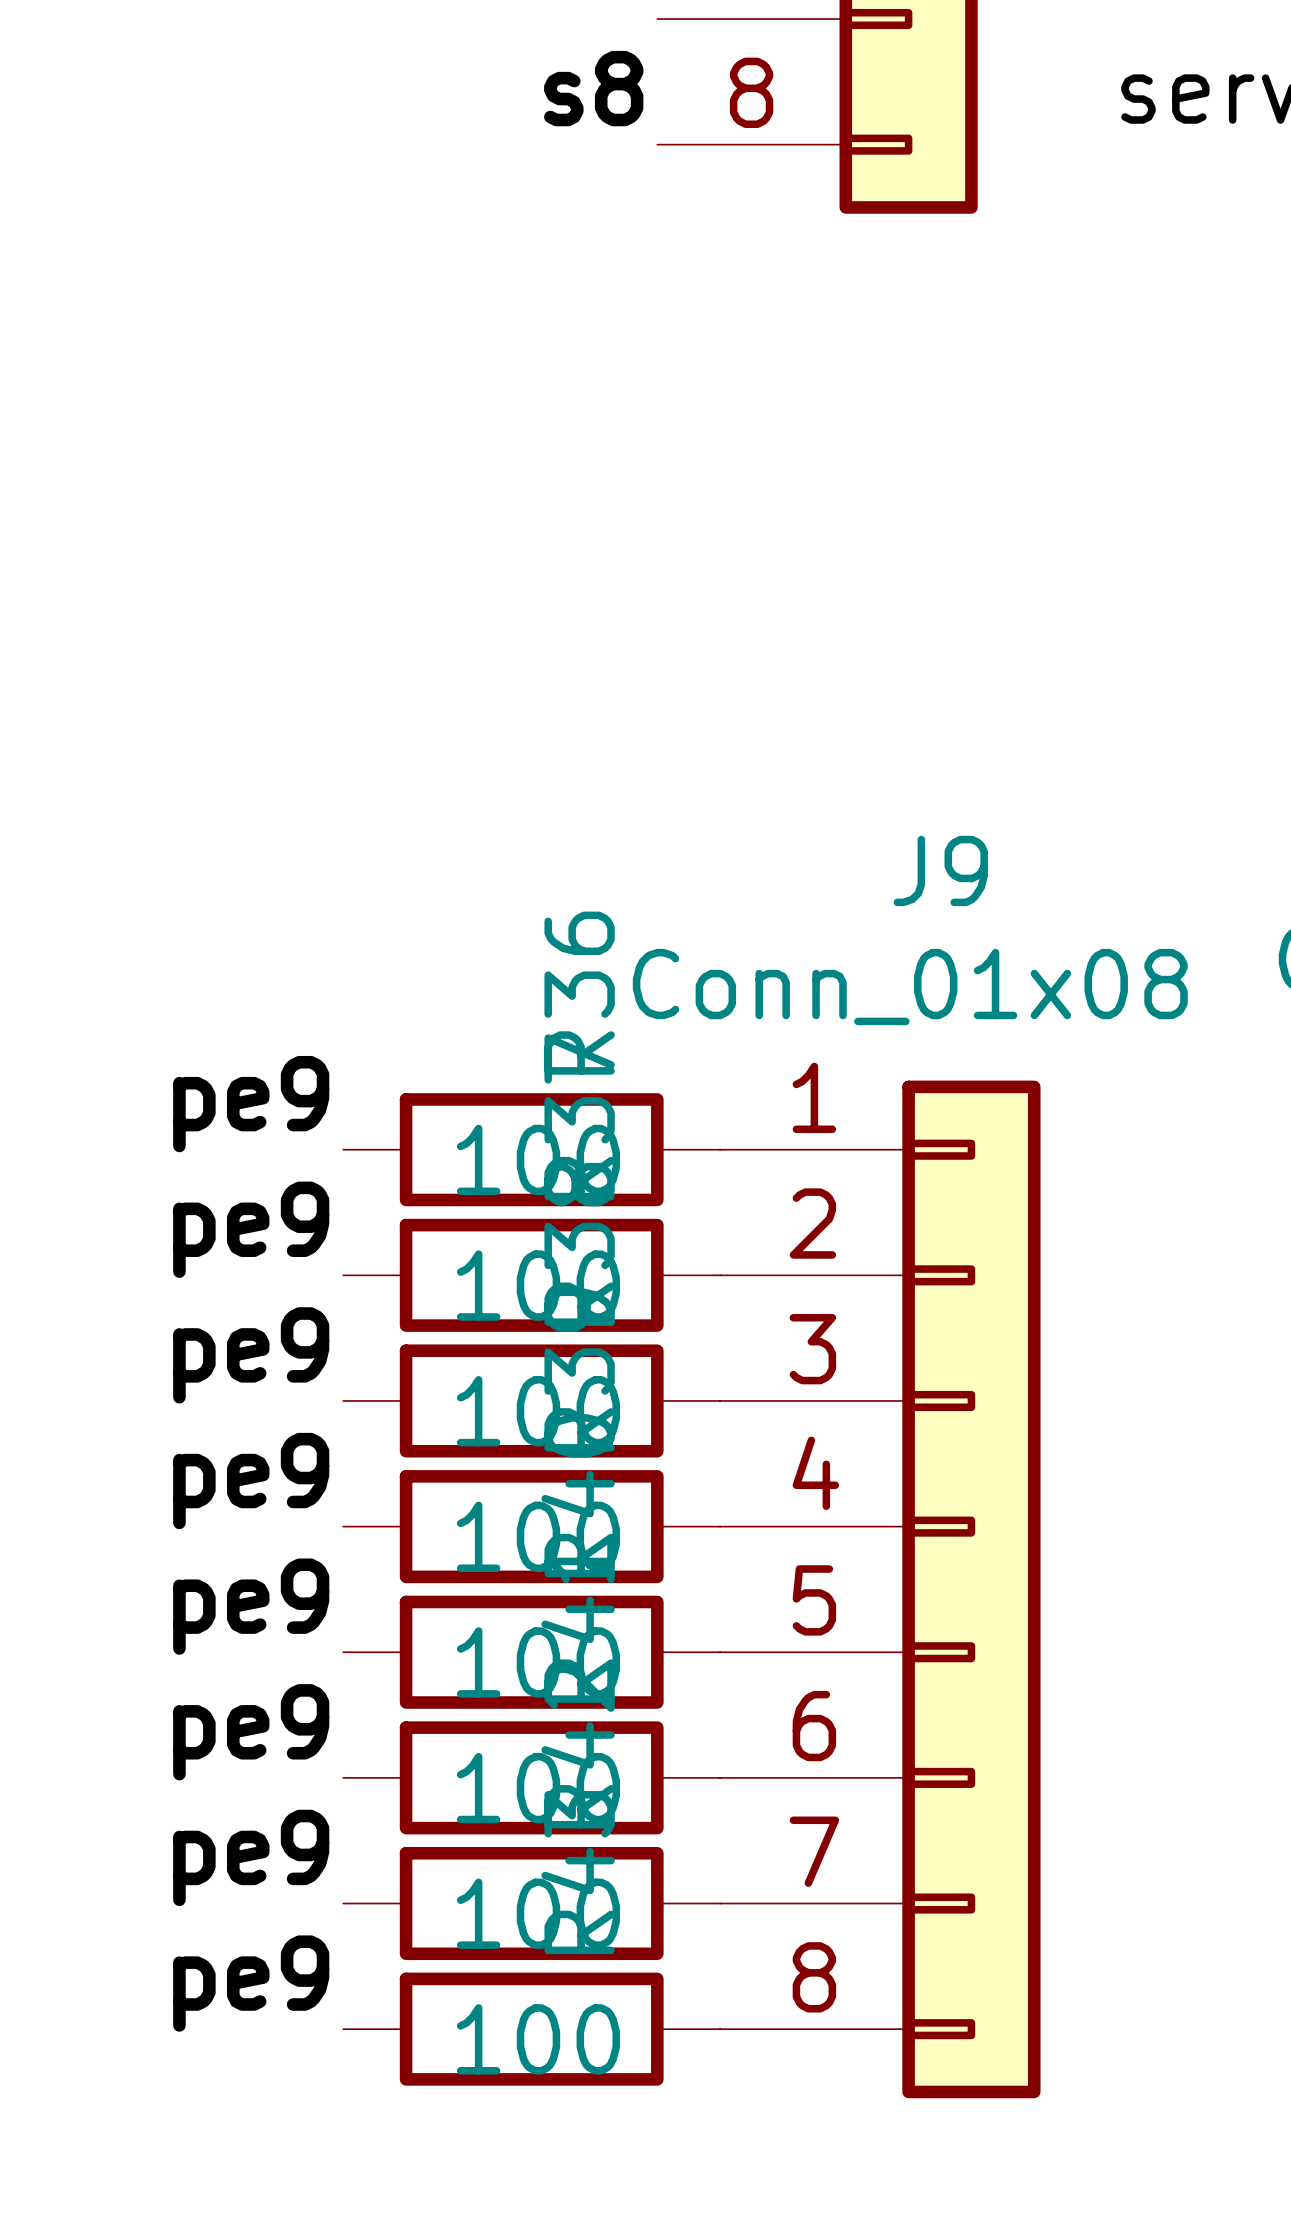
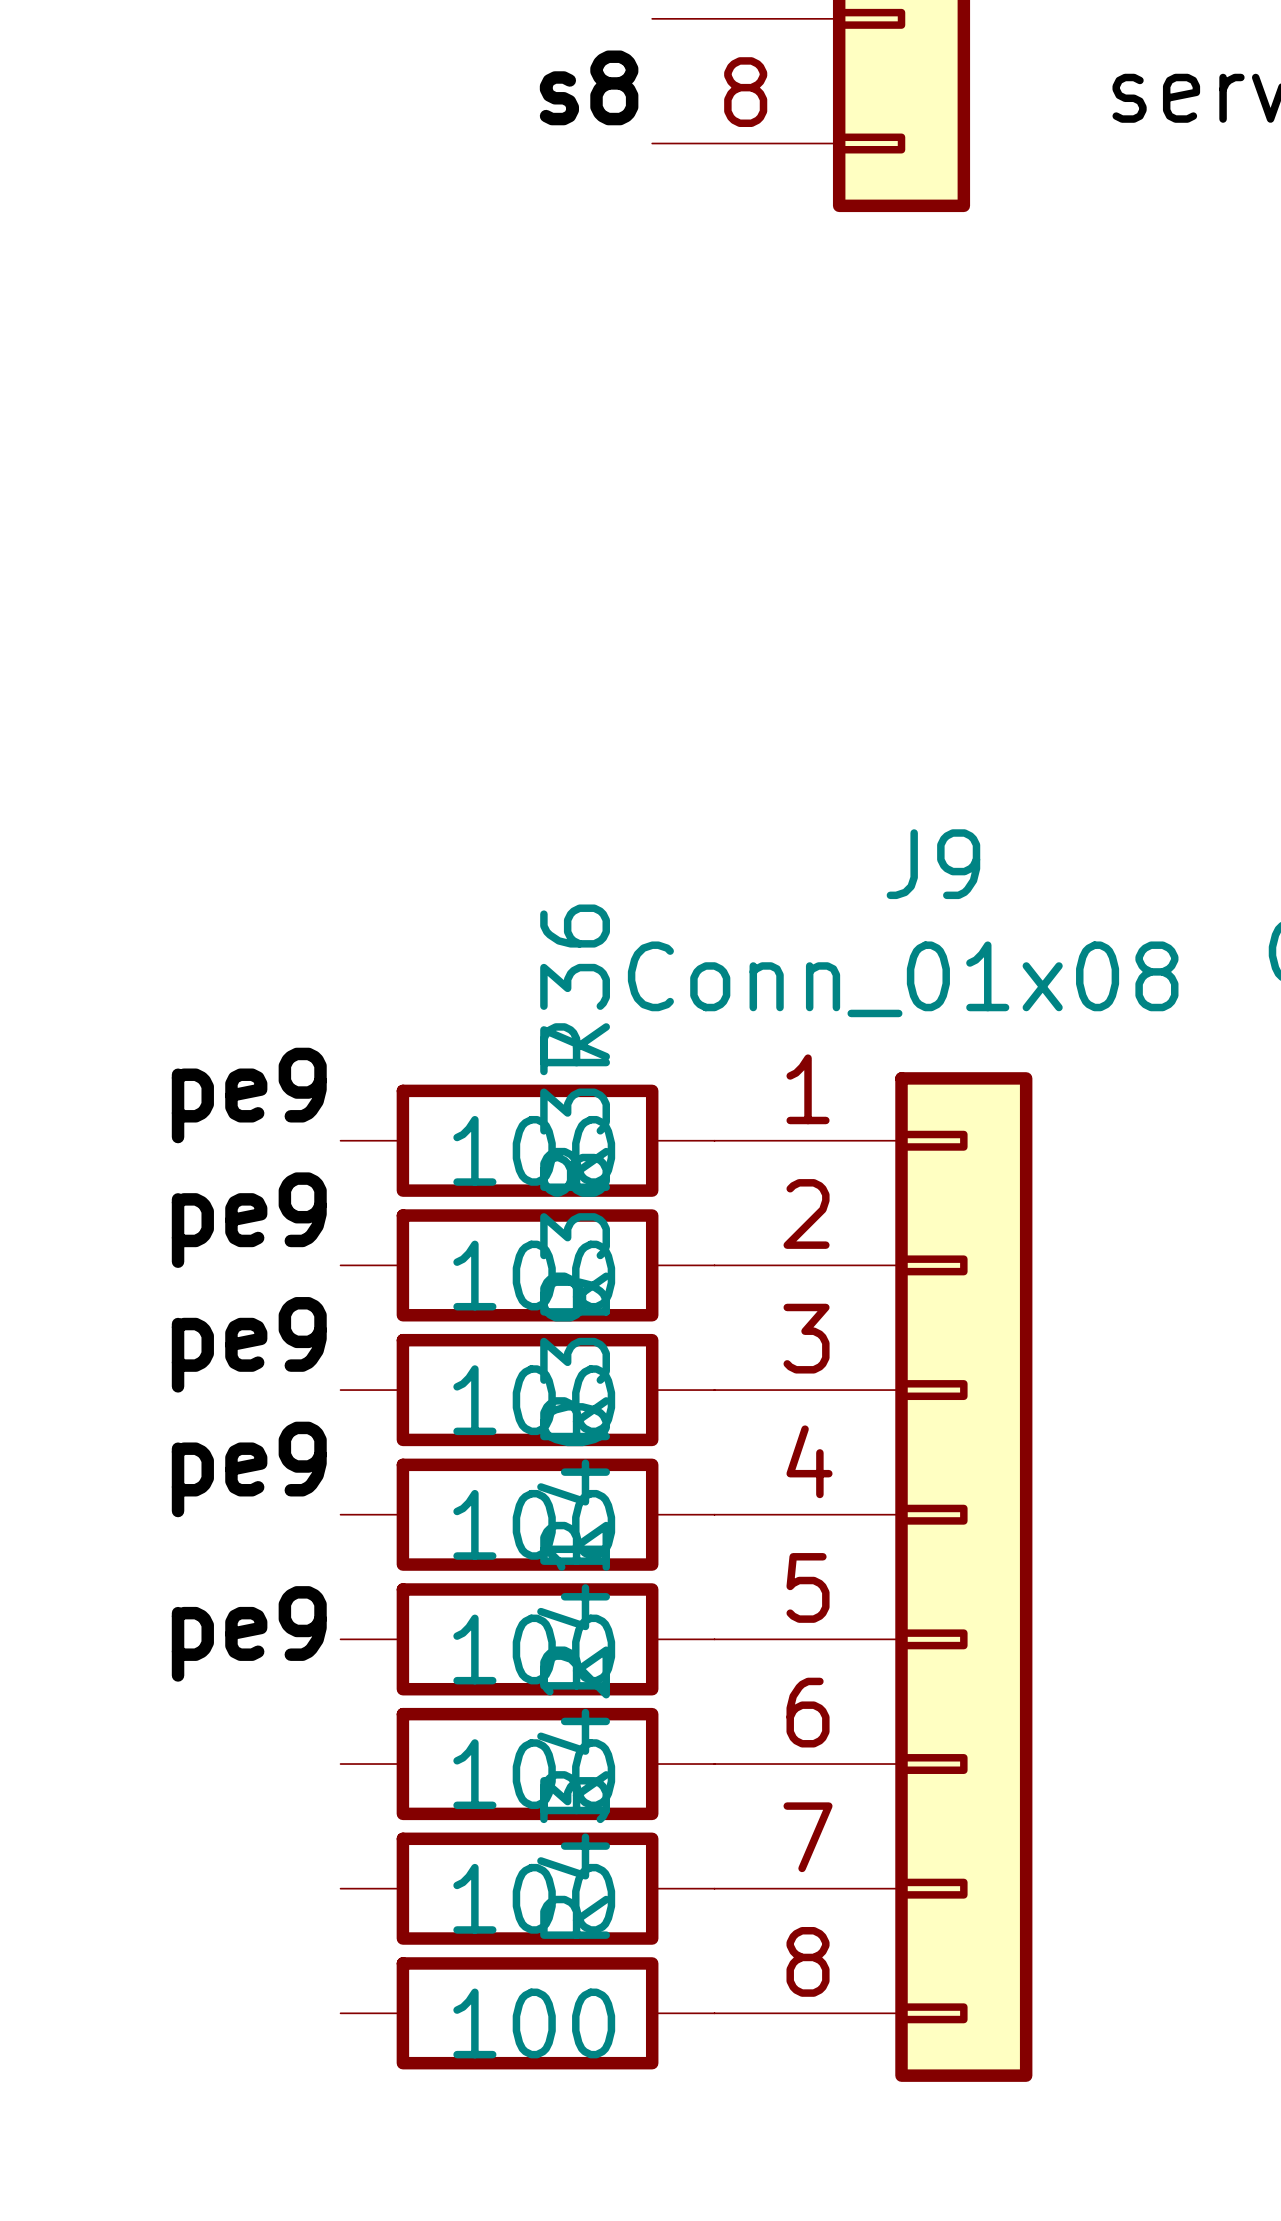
label position: pe9 (251, 1606) -> pe9 (249, 1633)
label: pe9 (251, 1732) -> none
label: pe9 (251, 1857) -> none
label: pe9 (251, 1983) -> none

